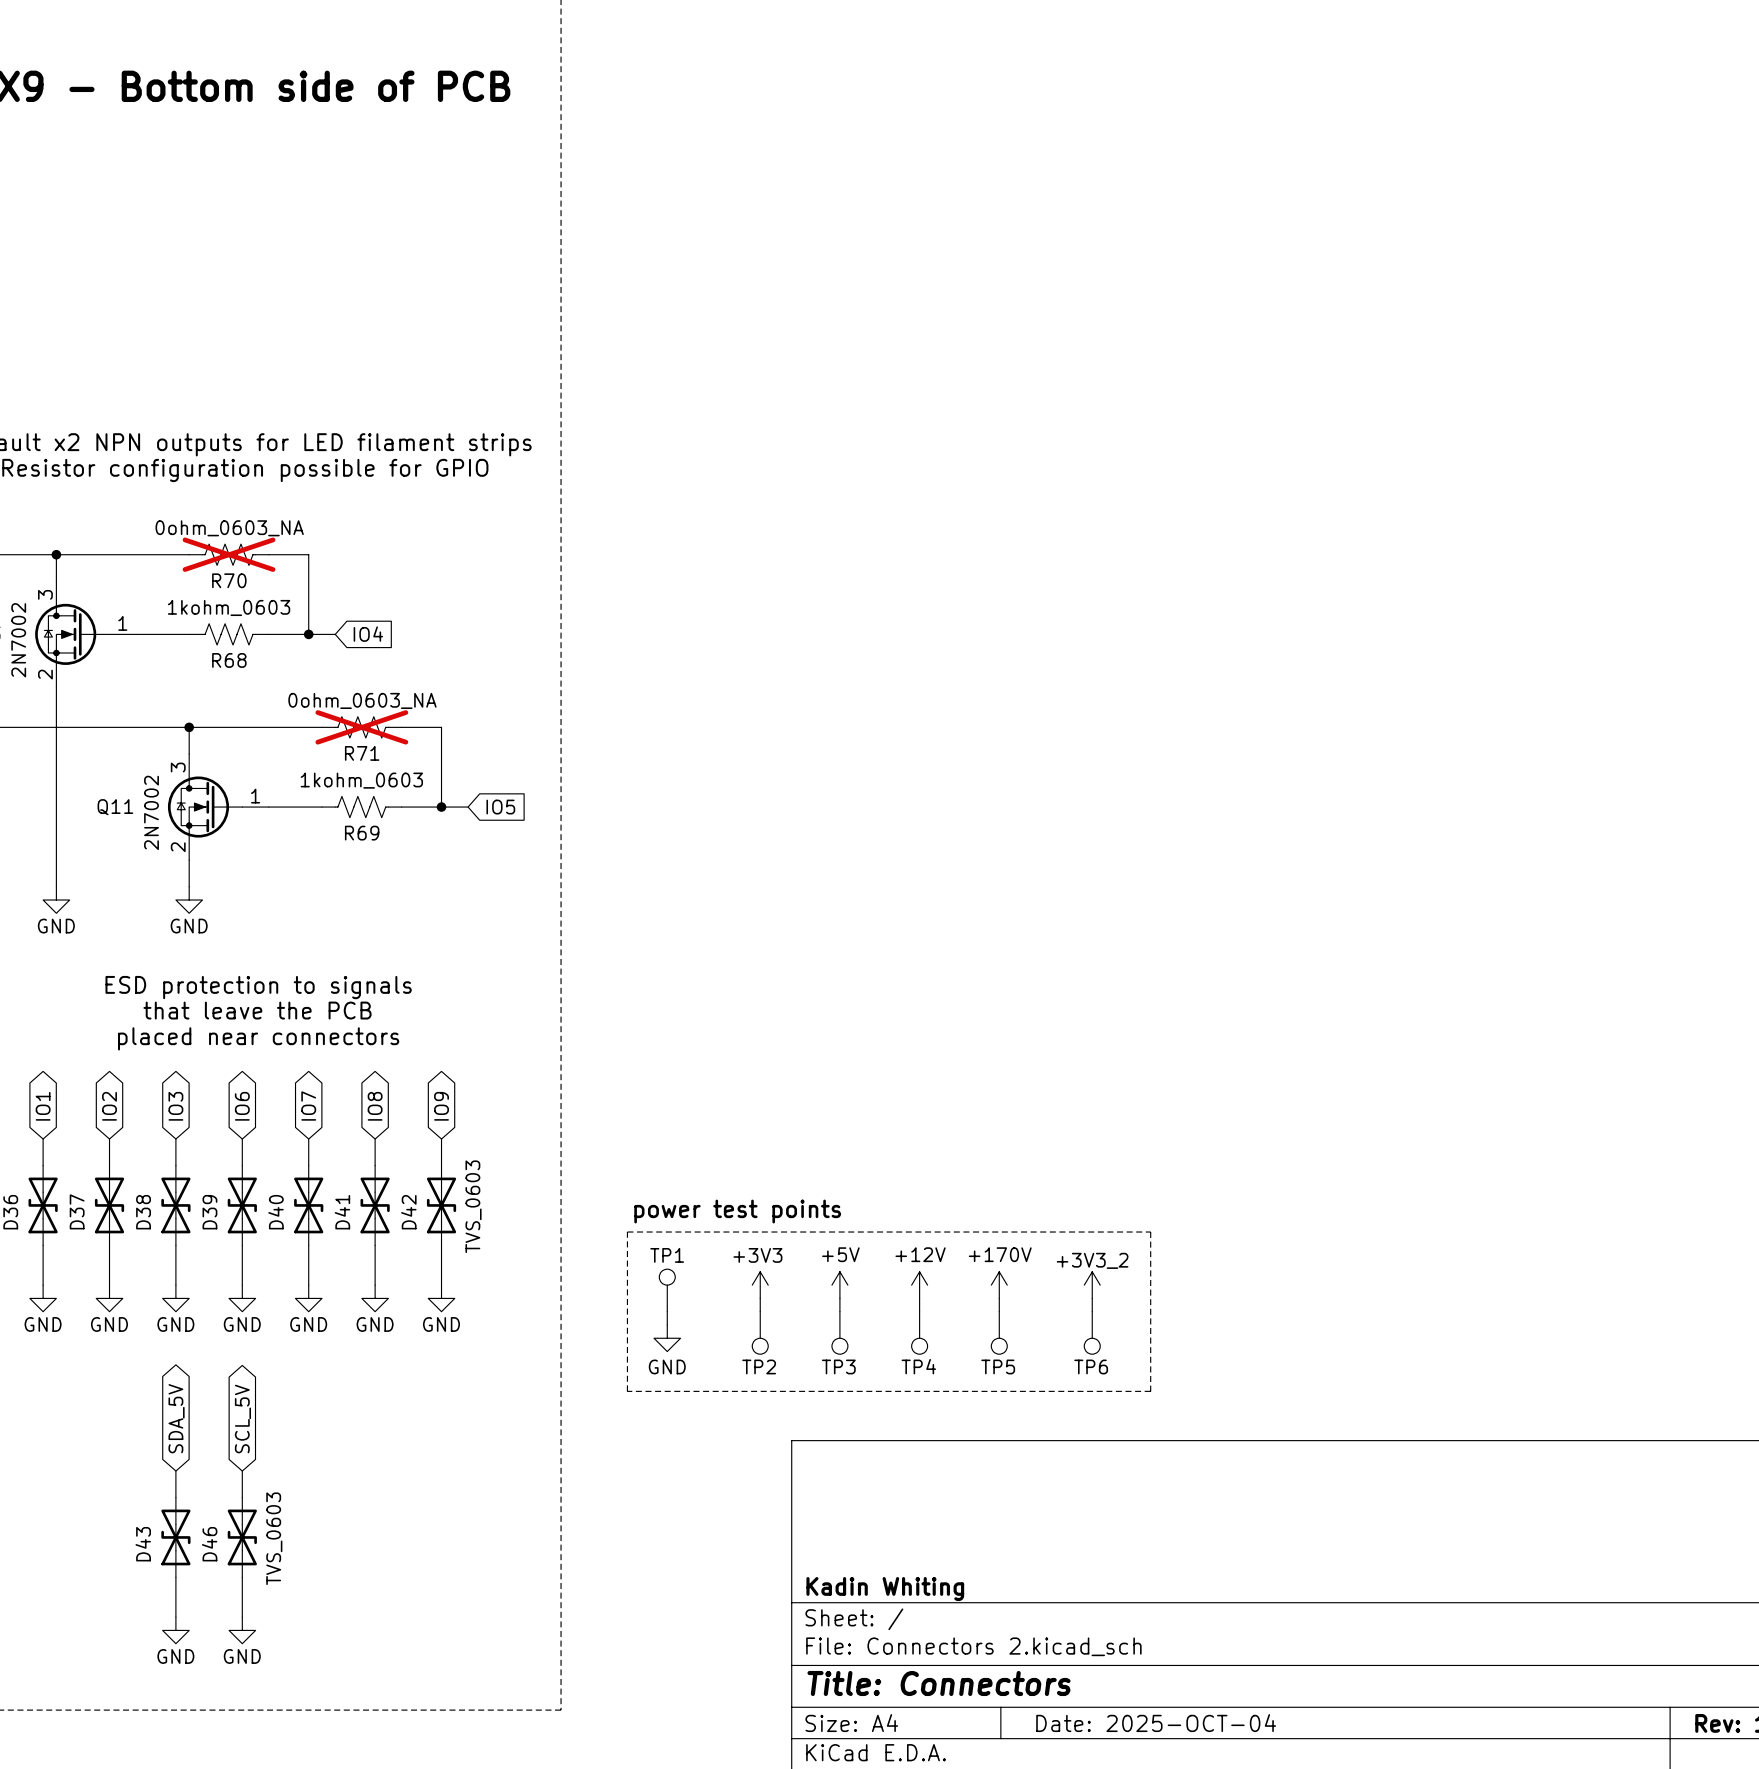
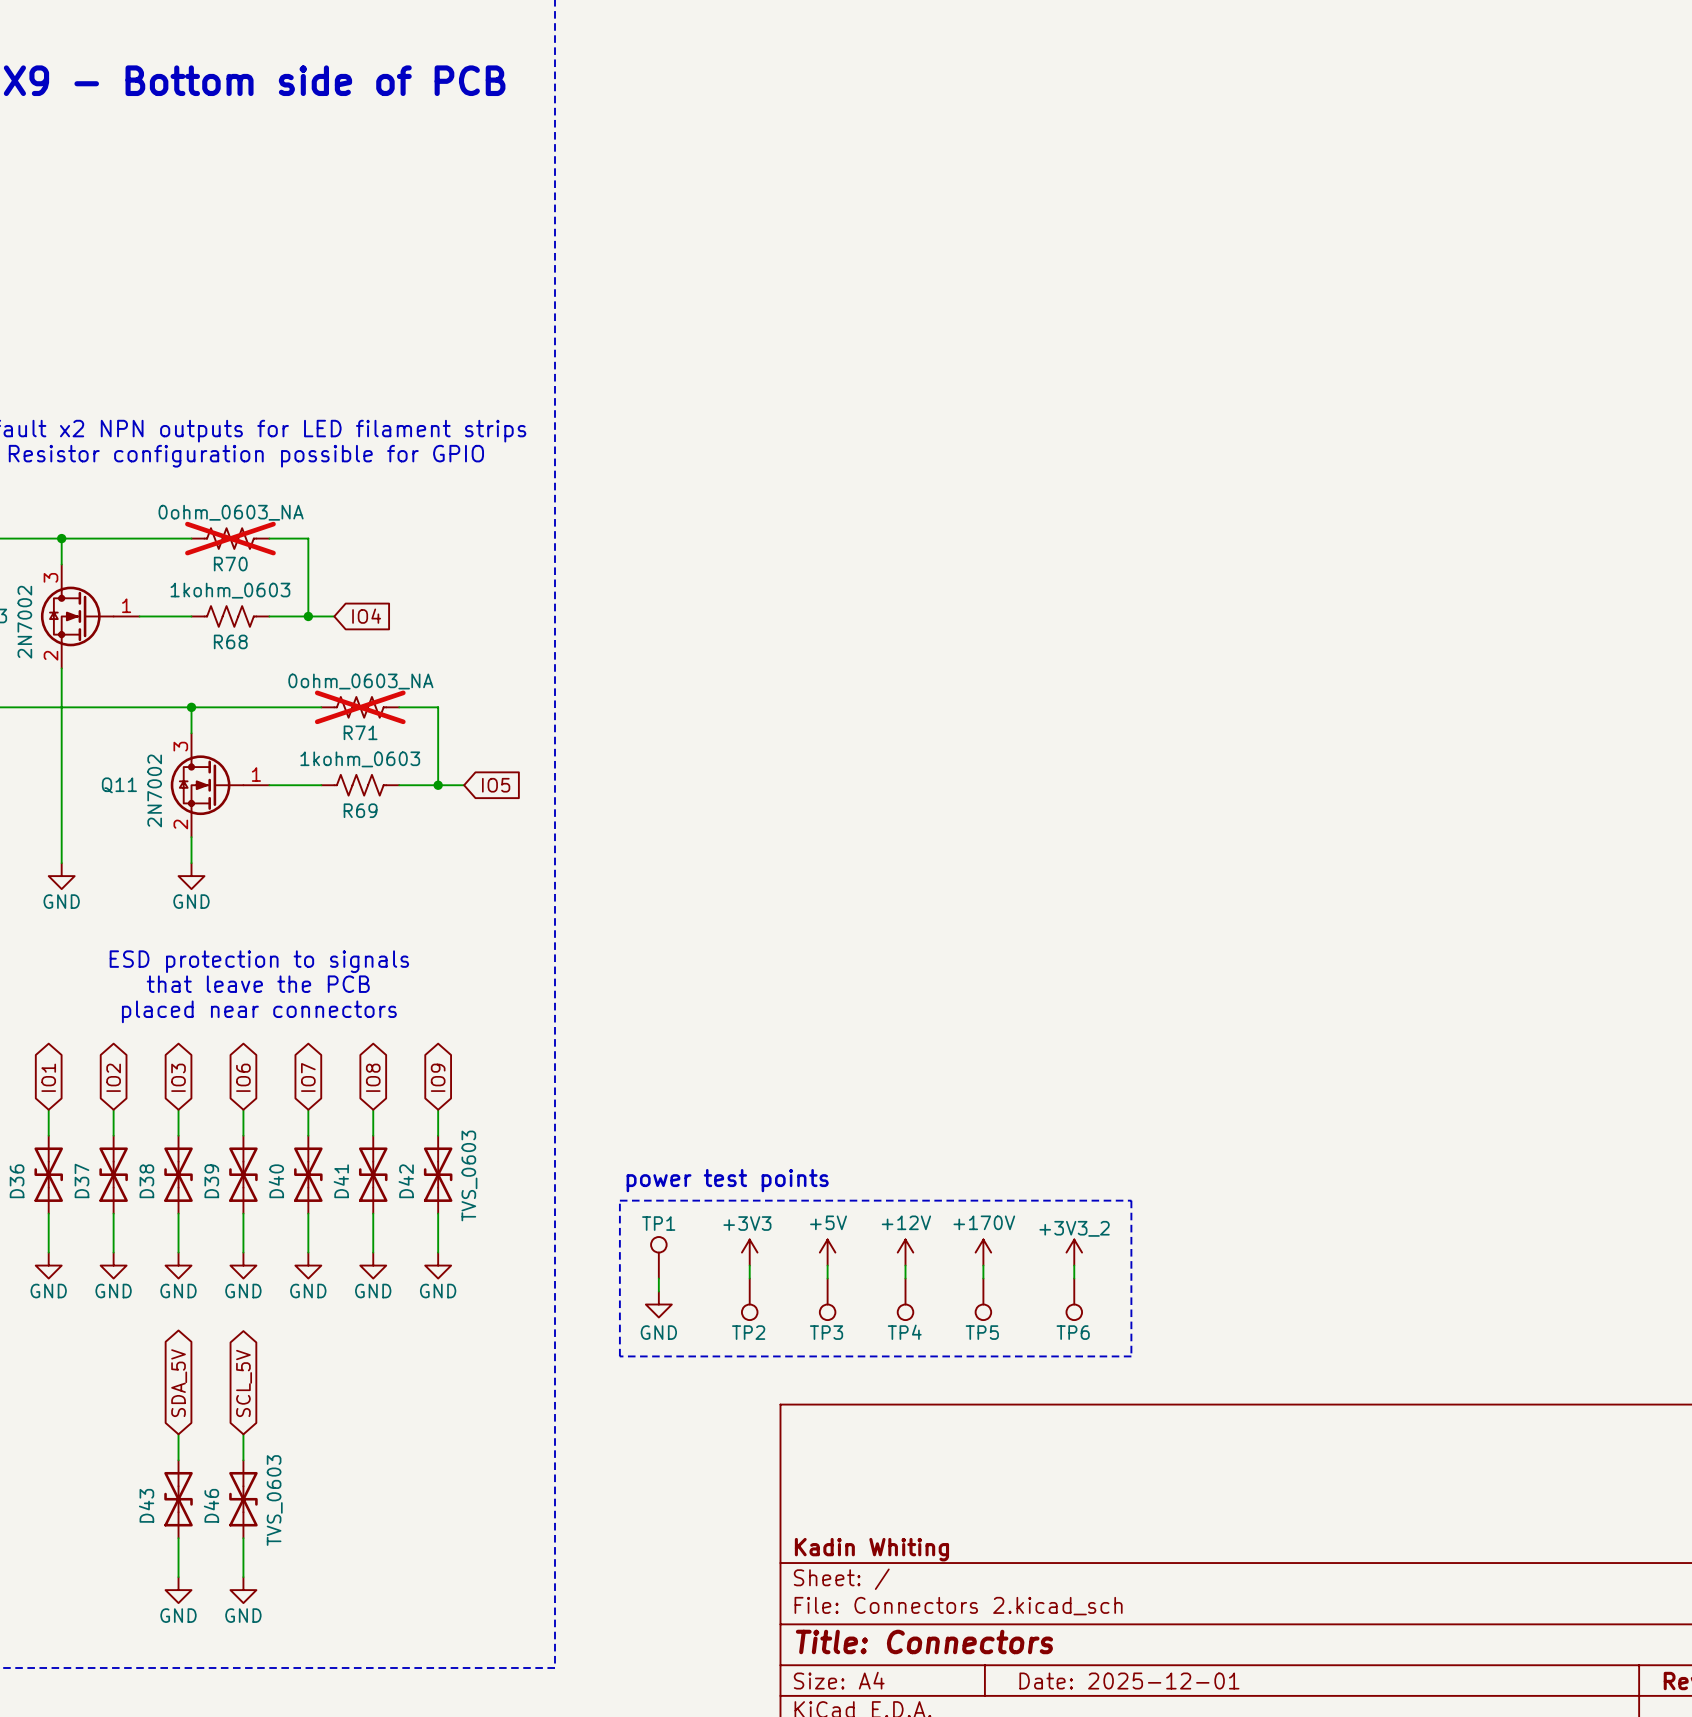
title block: Date: 2025-OCT-04 (1156, 1723) -> Date: 2025-12-01 (1129, 1681)

